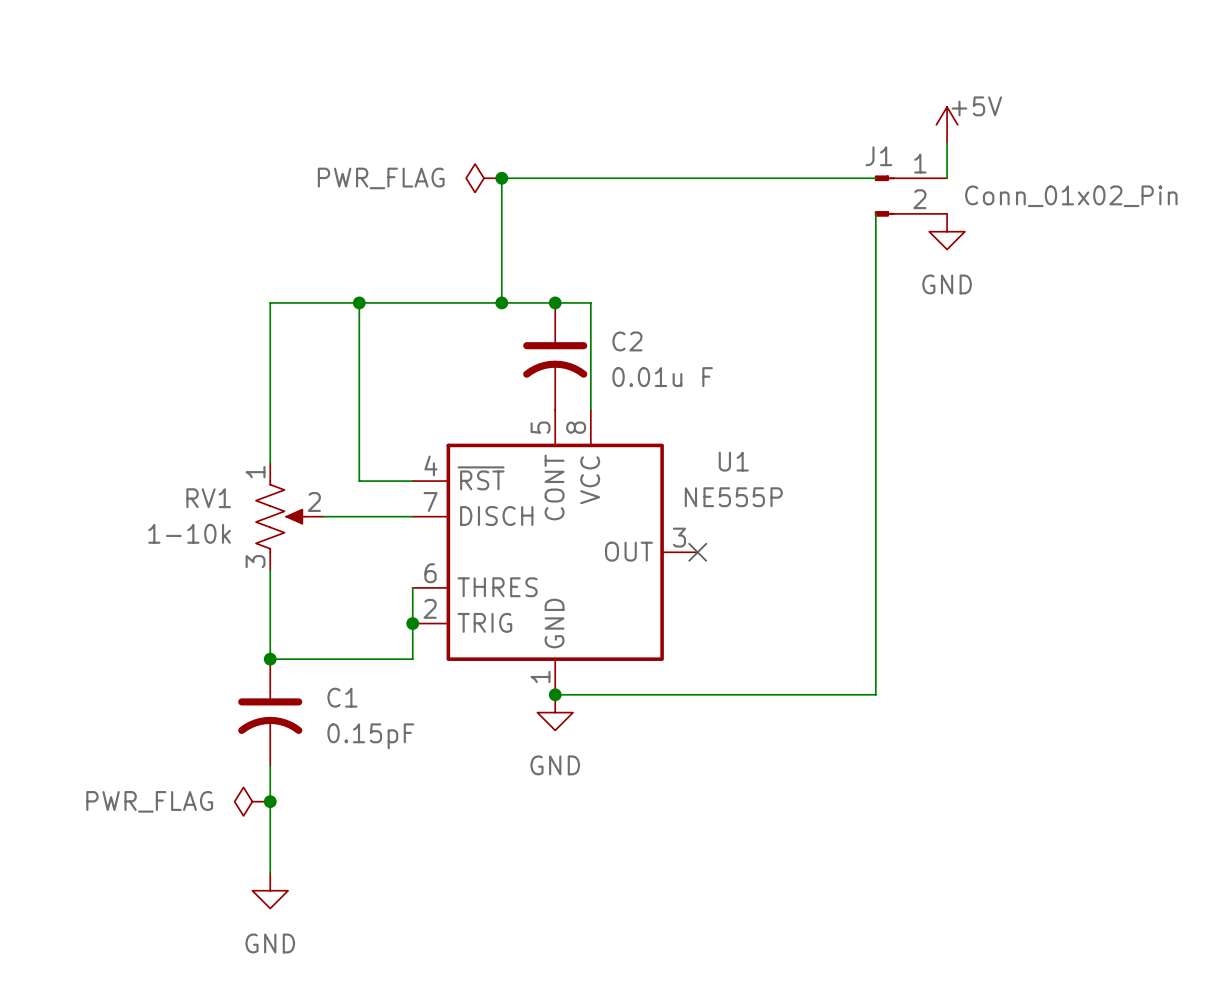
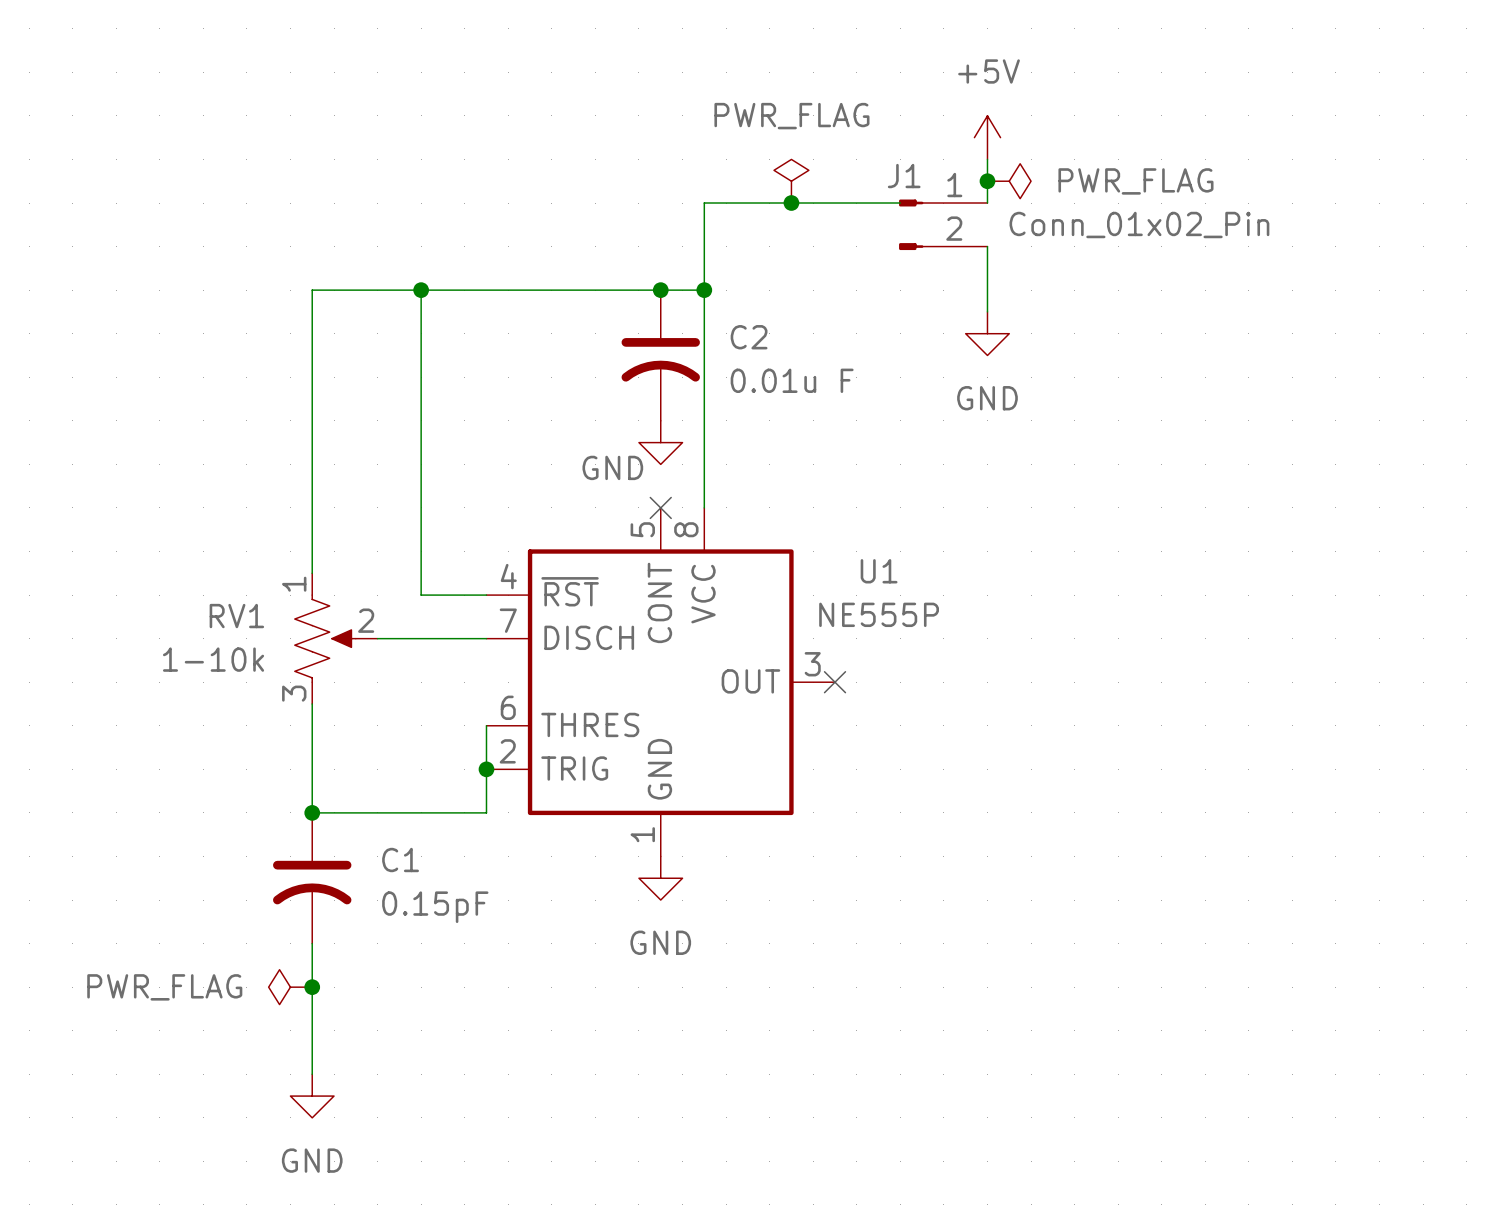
power symbol text position: +5V (976, 106) -> +5V (989, 71)
power symbol position: +5V (947, 124) -> +5V (987, 137)
power symbol: none -> PWR_FLAG (791, 181)
junction: none -> (987, 181)
power symbol: none -> PWR_FLAG (1009, 181)
wire: (947, 142) (947, 178) -> (987, 159) (987, 203)
junction: none -> (791, 203)
wire: none -> (900, 203) (704, 203) (704, 377)
power symbol: PWR_FLAG (483, 178) -> none
junction: (501, 178) -> none
wire: (875, 178) (501, 178) (501, 302) -> none
wire: none -> (987, 246) (987, 311)
J1 position: (910, 196) -> (943, 224)
wire: (875, 213) (875, 694) (555, 694) -> none
wire: none -> (421, 290) (421, 377)
junction: none -> (660, 290)
junction: none -> (704, 290)
power symbol position: GND (947, 231) -> GND (987, 333)
wire: (270, 302) (590, 302) -> (312, 377) (312, 290) (704, 290)
junction position: (359, 302) -> (421, 290)
junction: (501, 302) -> none
junction: (555, 302) -> none
C2 position: (555, 356) -> (660, 355)
power symbol: none -> GND (660, 442)
no-connect mark: none -> (660, 507)
junction: (555, 694) -> none

